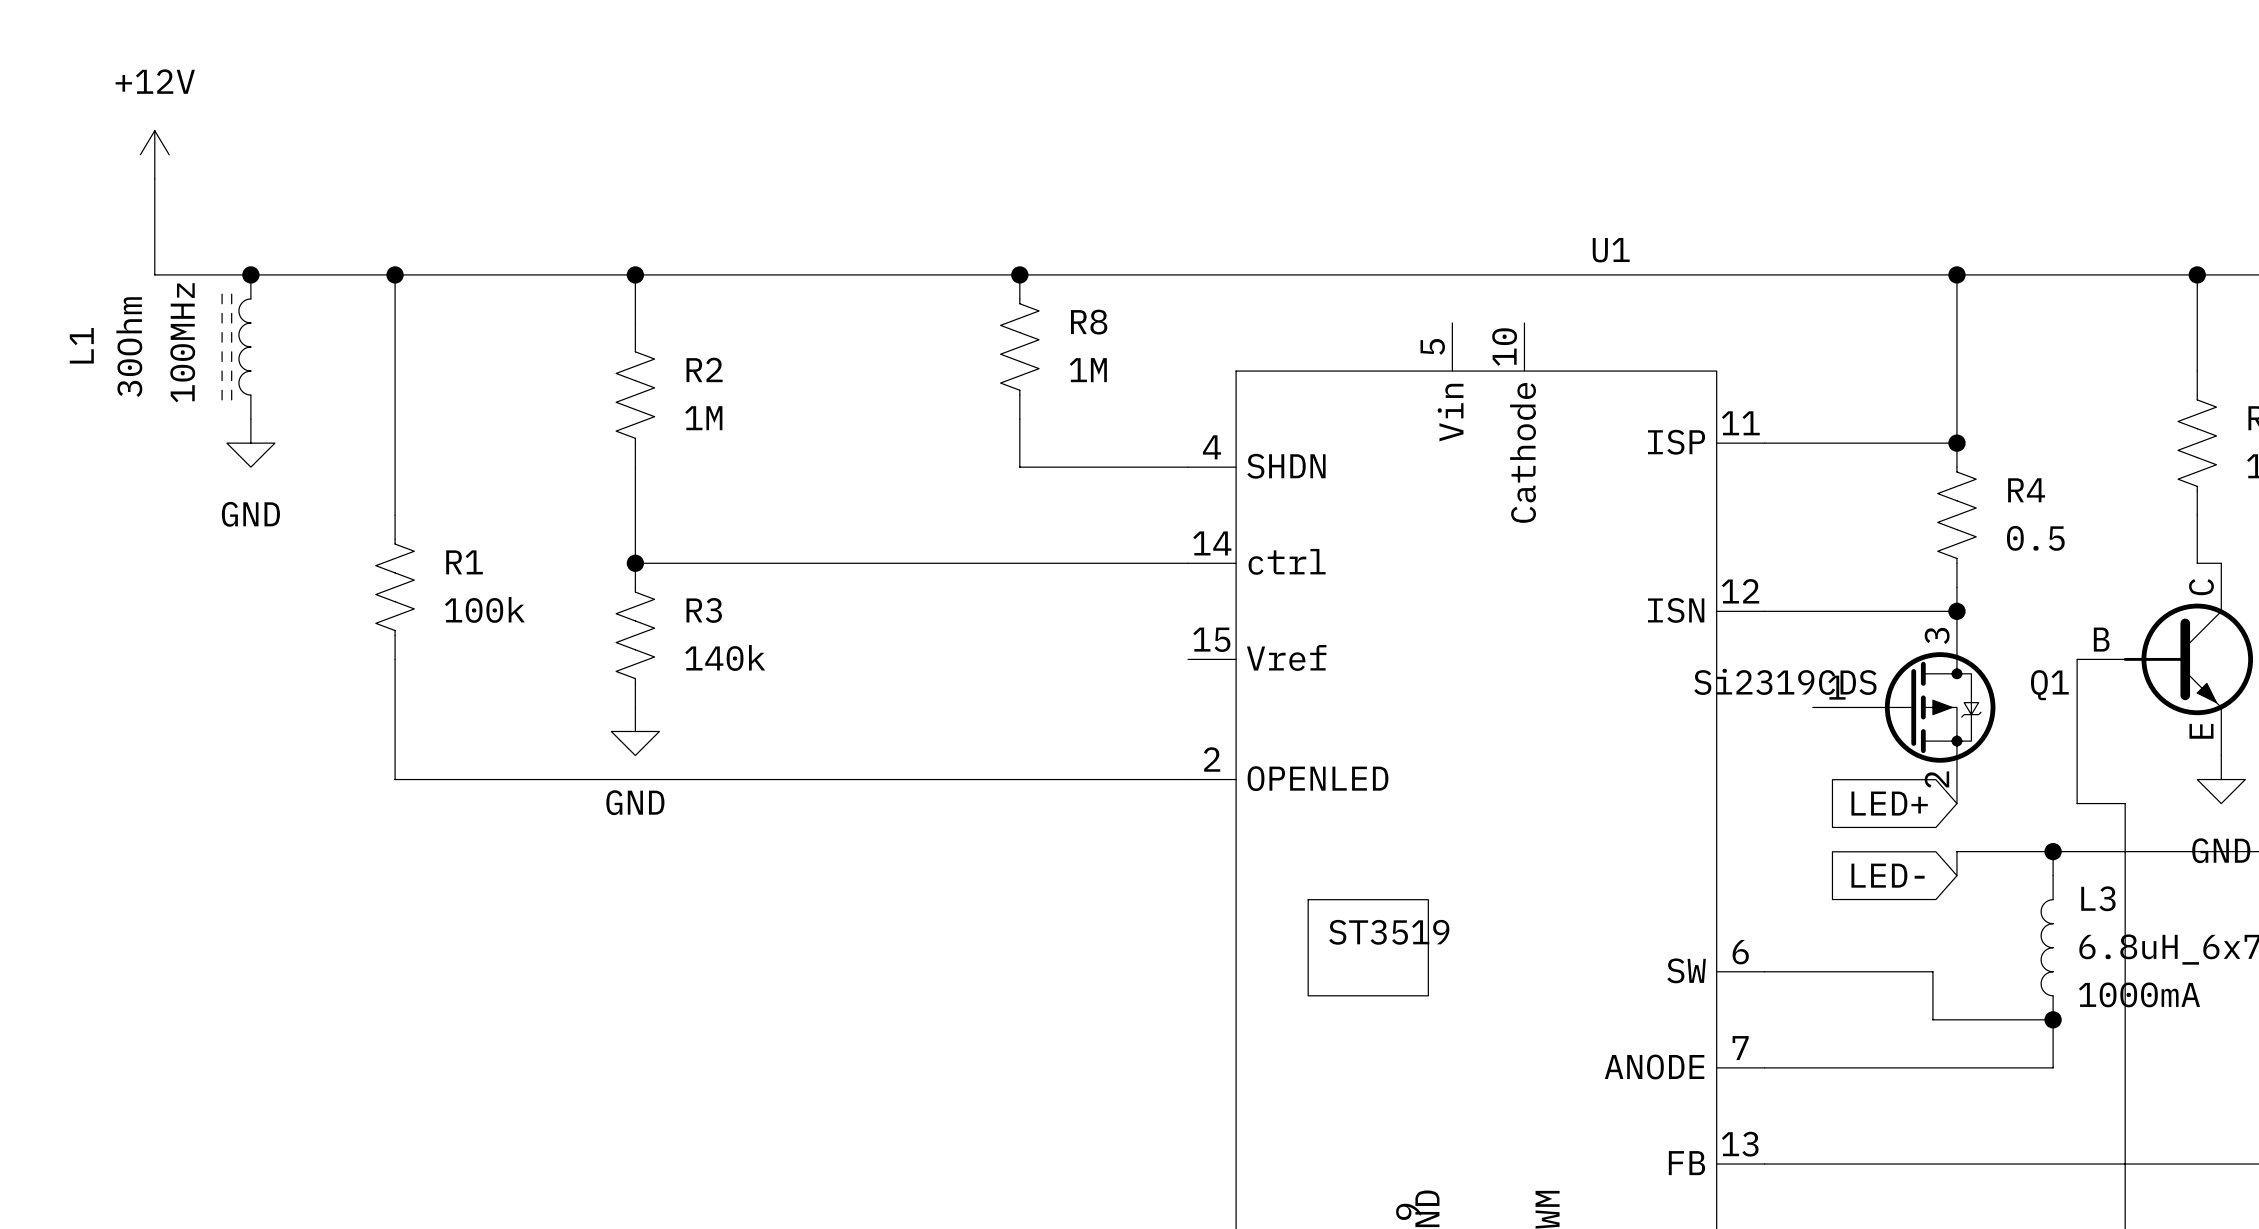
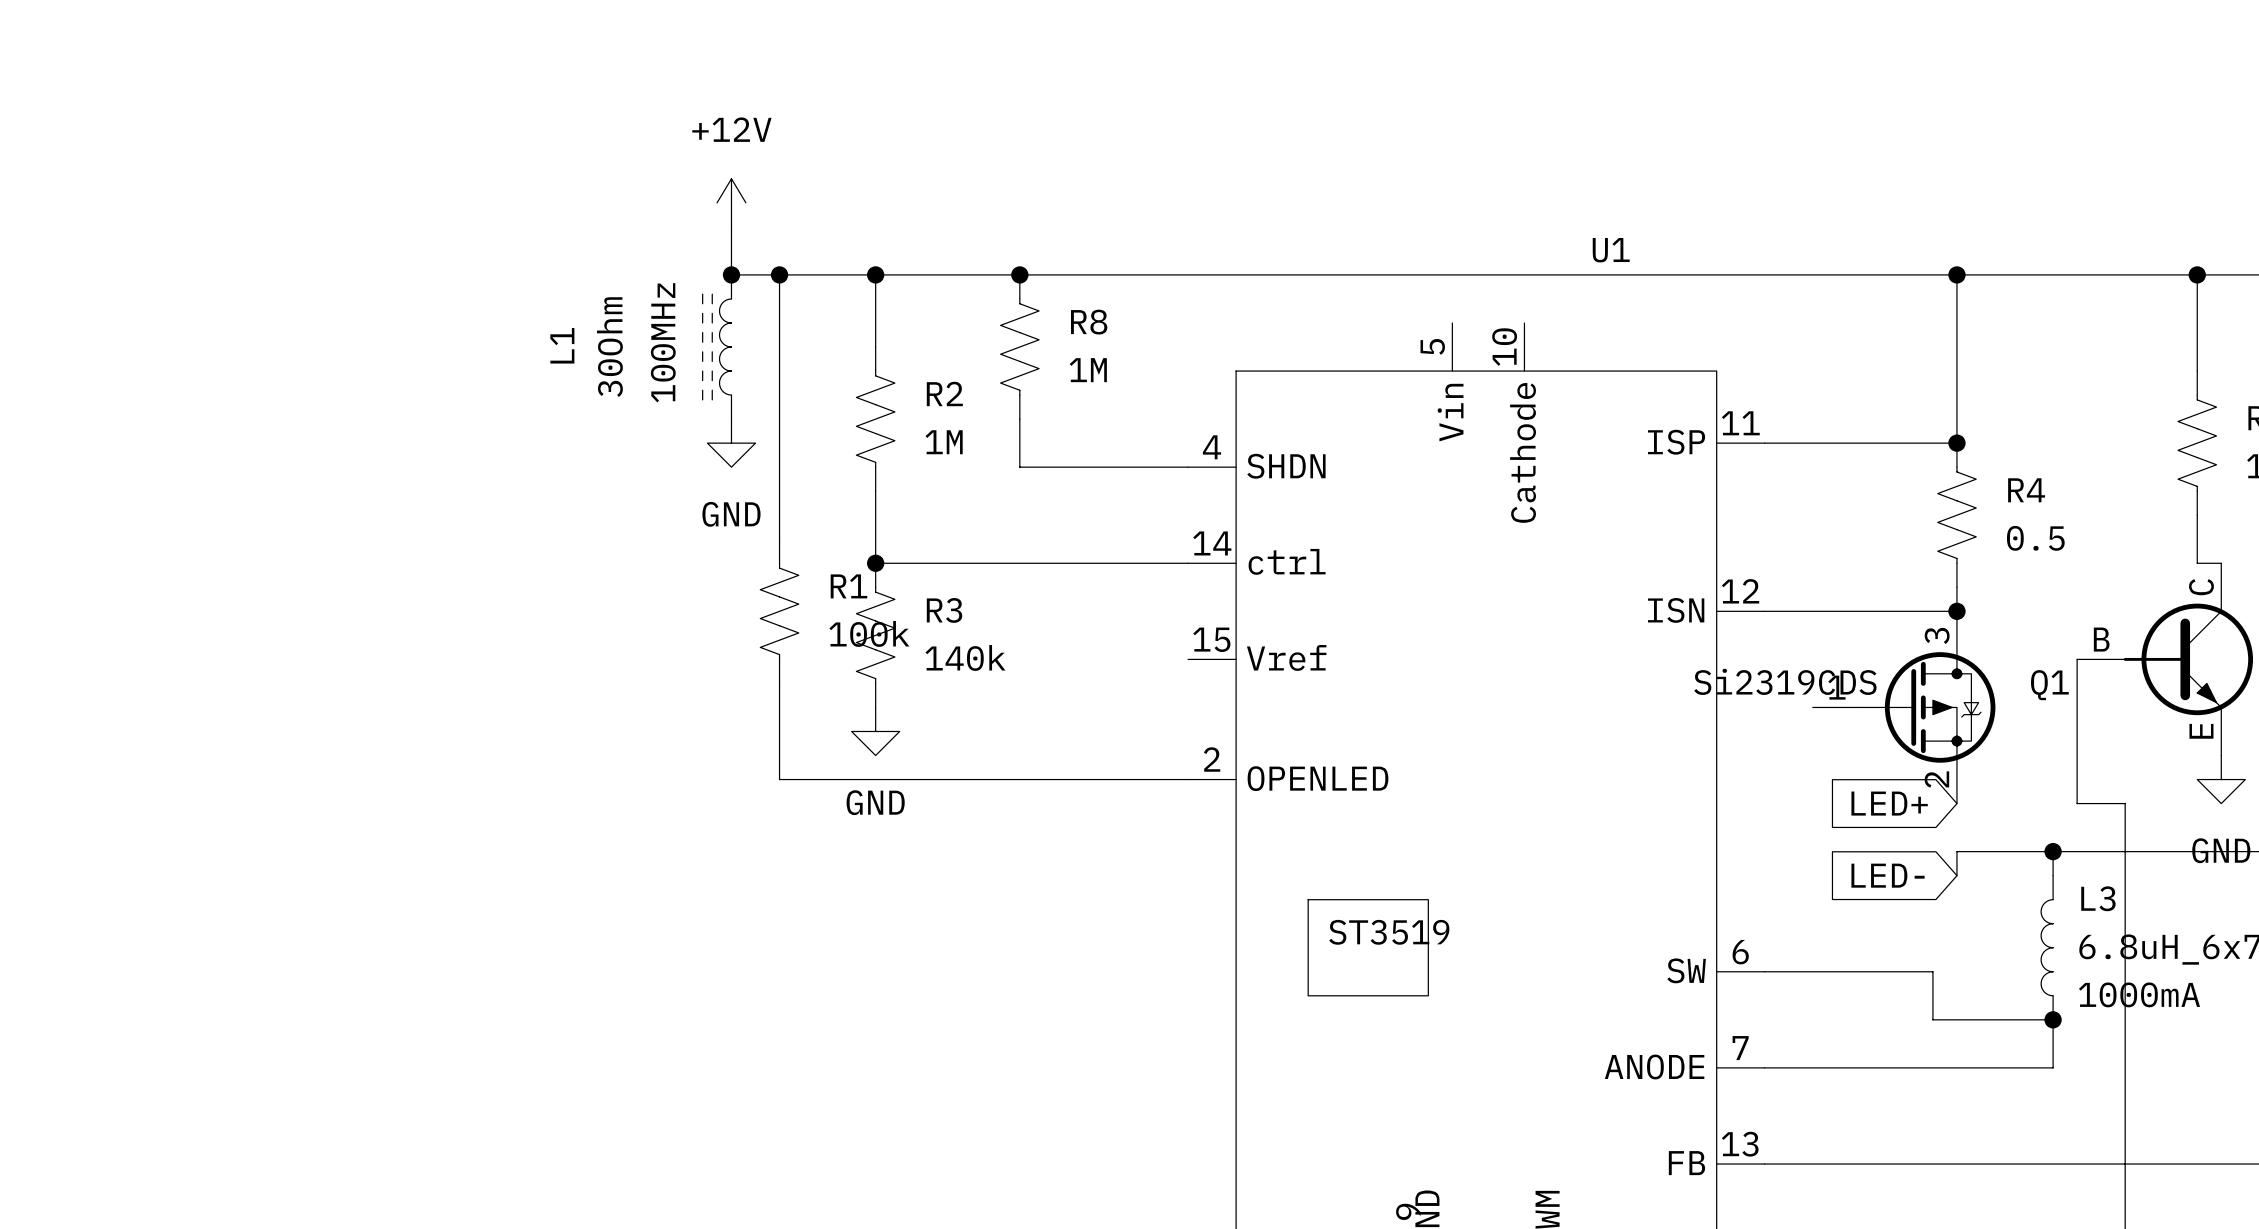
power symbol: +12V (154, 154) -> none
wire: (154, 178) (154, 274) (731, 274) -> (731, 226) (731, 274)
power symbol: none -> +12V (731, 202)
junction: (250, 274) -> none
wire: (395, 274) (395, 515) -> none
junction: (395, 274) -> none
wire: (635, 274) (635, 322) -> none
junction: (635, 274) -> none
junction: none -> (731, 274)
wire: none -> (779, 274) (779, 539)
junction: none -> (779, 274)
wire: none -> (875, 274) (875, 347)
junction: none -> (875, 274)
L1 position: (236, 347) -> (717, 347)
R2 position: (635, 395) -> (875, 419)
power symbol: GND (250, 443) -> none
power symbol: none -> GND (731, 443)
wire: (635, 467) (635, 563) (875, 563) -> (875, 491) (875, 563)
junction: (635, 563) -> none
junction: none -> (875, 563)
R1 position: (395, 587) -> (779, 611)
R3 position: (635, 635) -> (875, 635)
wire: (395, 659) (395, 779) (779, 779) -> (779, 683) (779, 779)
power symbol: GND (635, 731) -> none
power symbol: none -> GND (875, 731)

